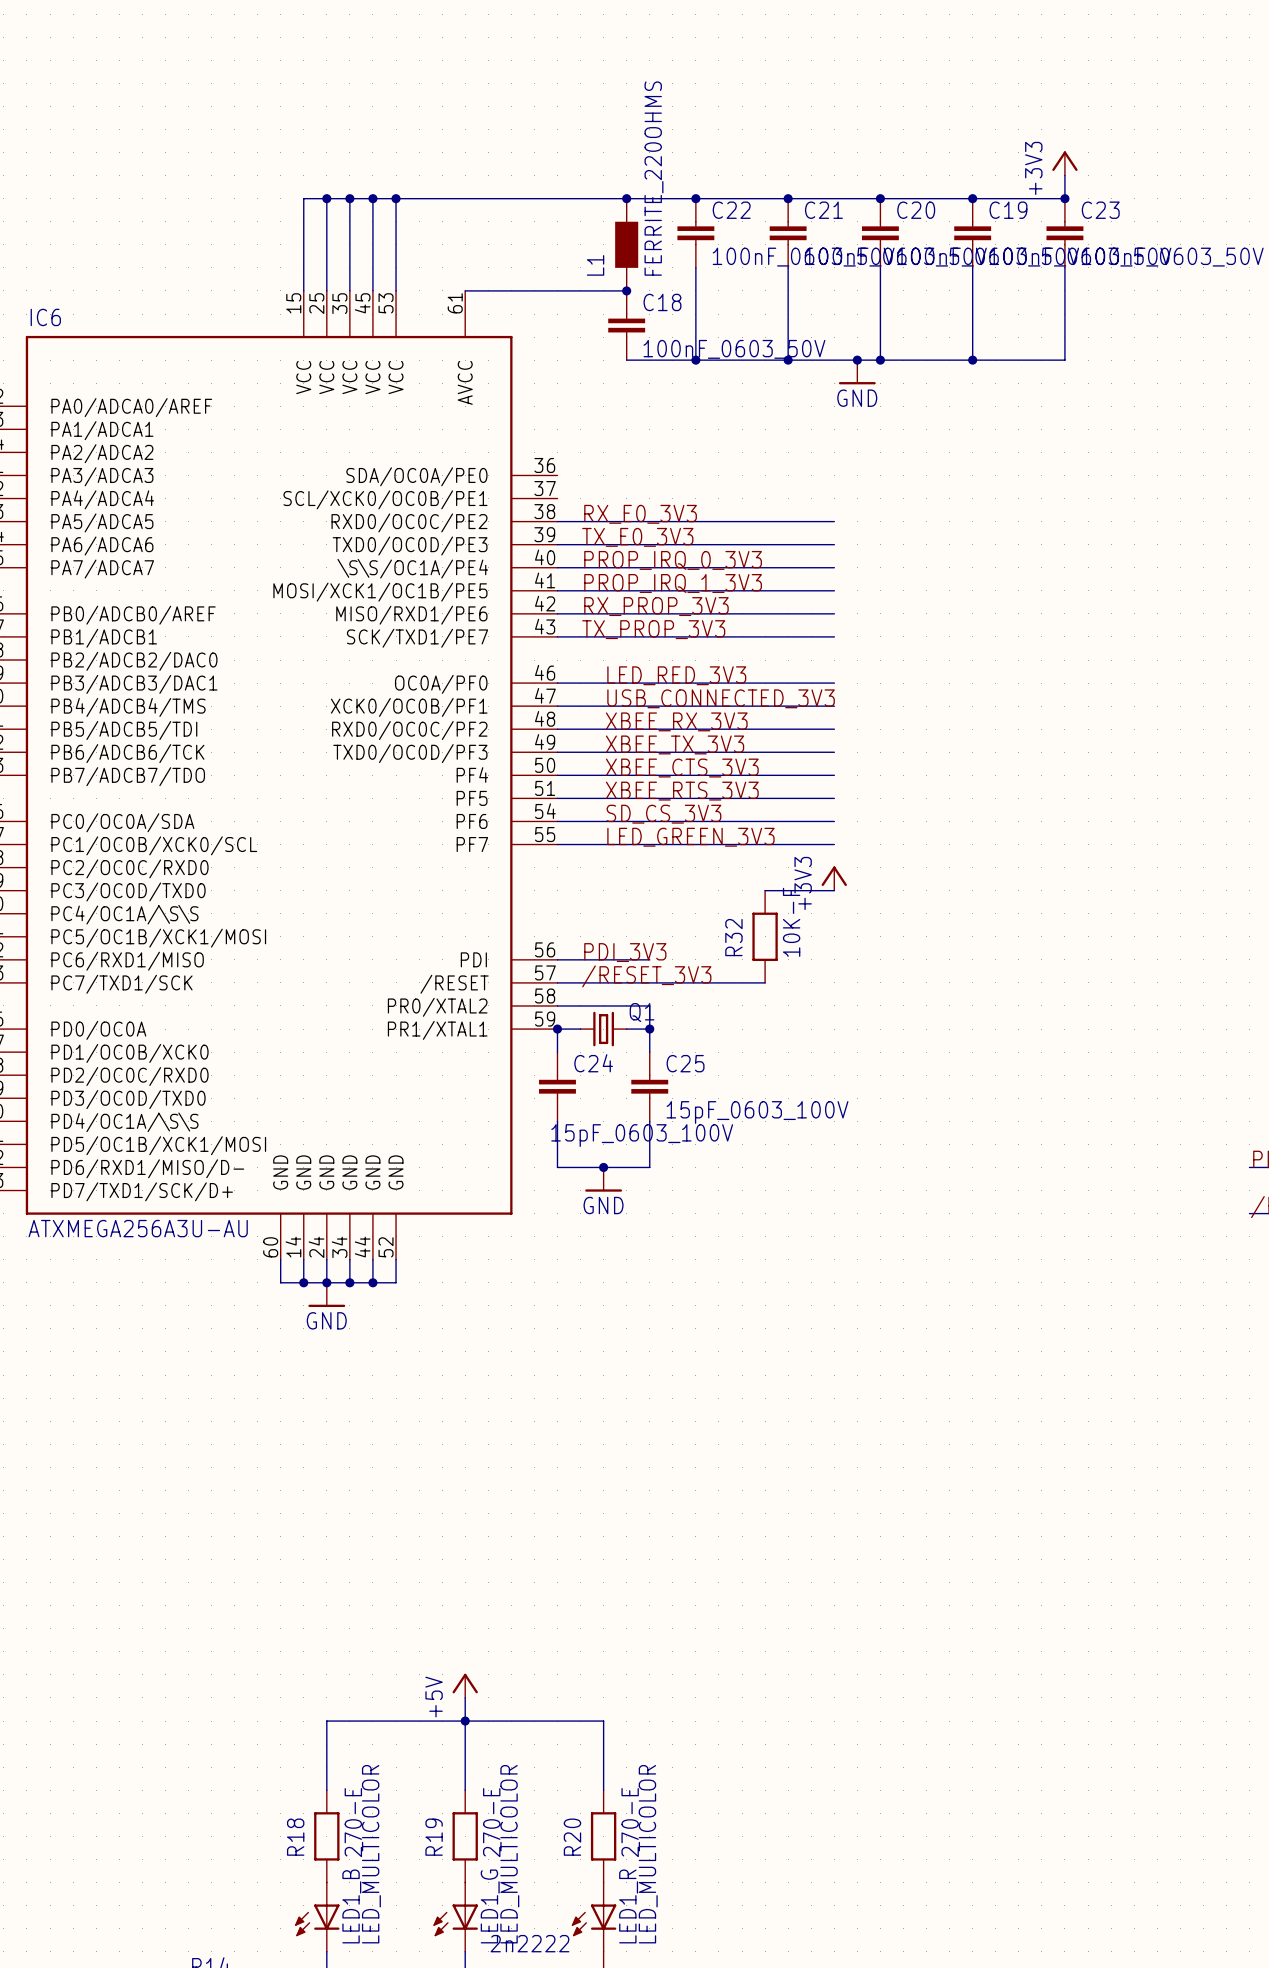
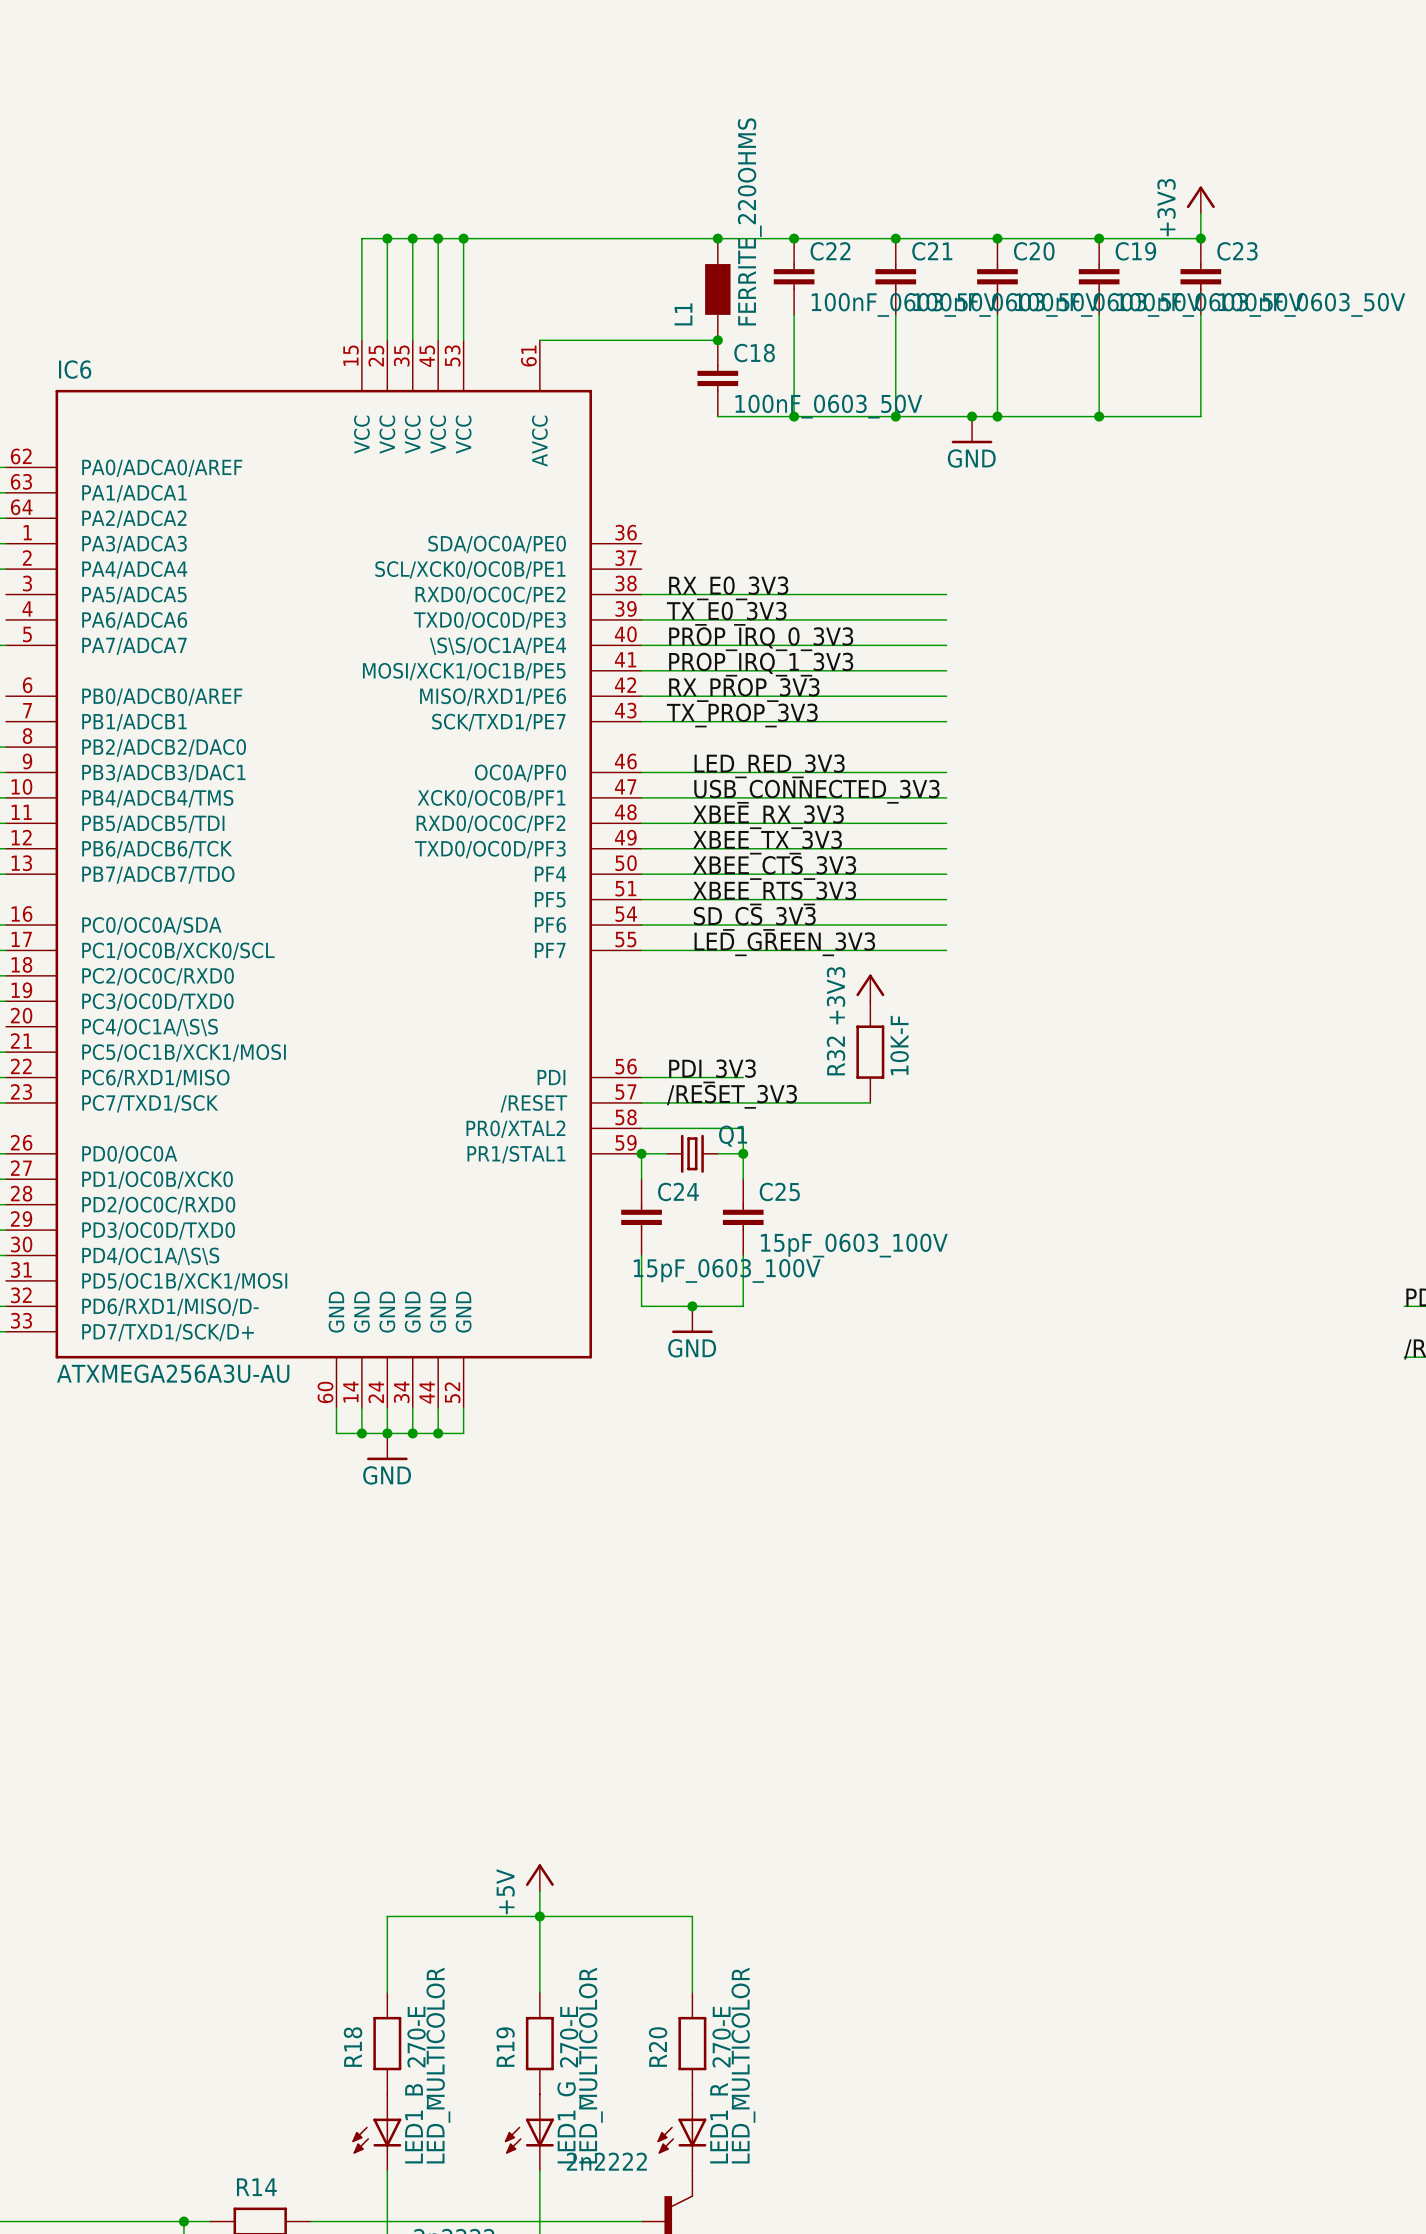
power symbol position: +3V3 (834, 878) -> +3V3 (870, 987)
wire: (765, 890) (834, 890) -> none
IC6 pin name: PR1/XTAL1 (437, 1030) -> PR1/STAL1 (516, 1154)

